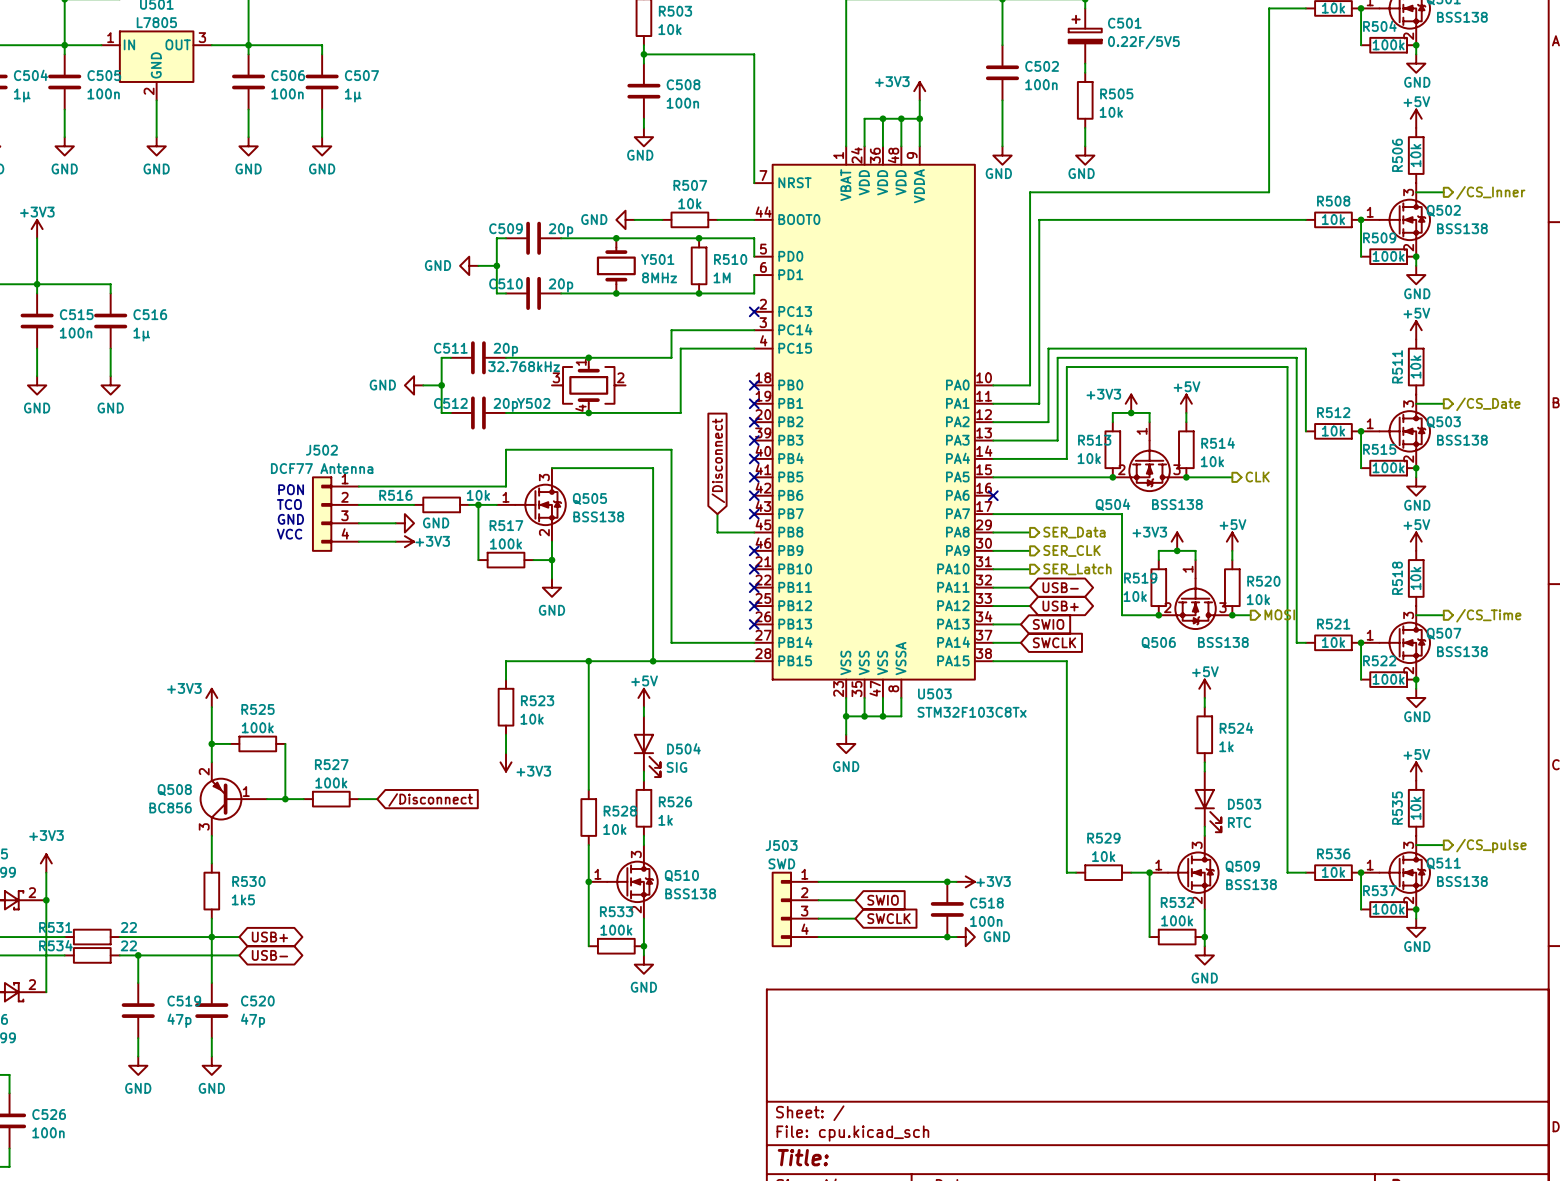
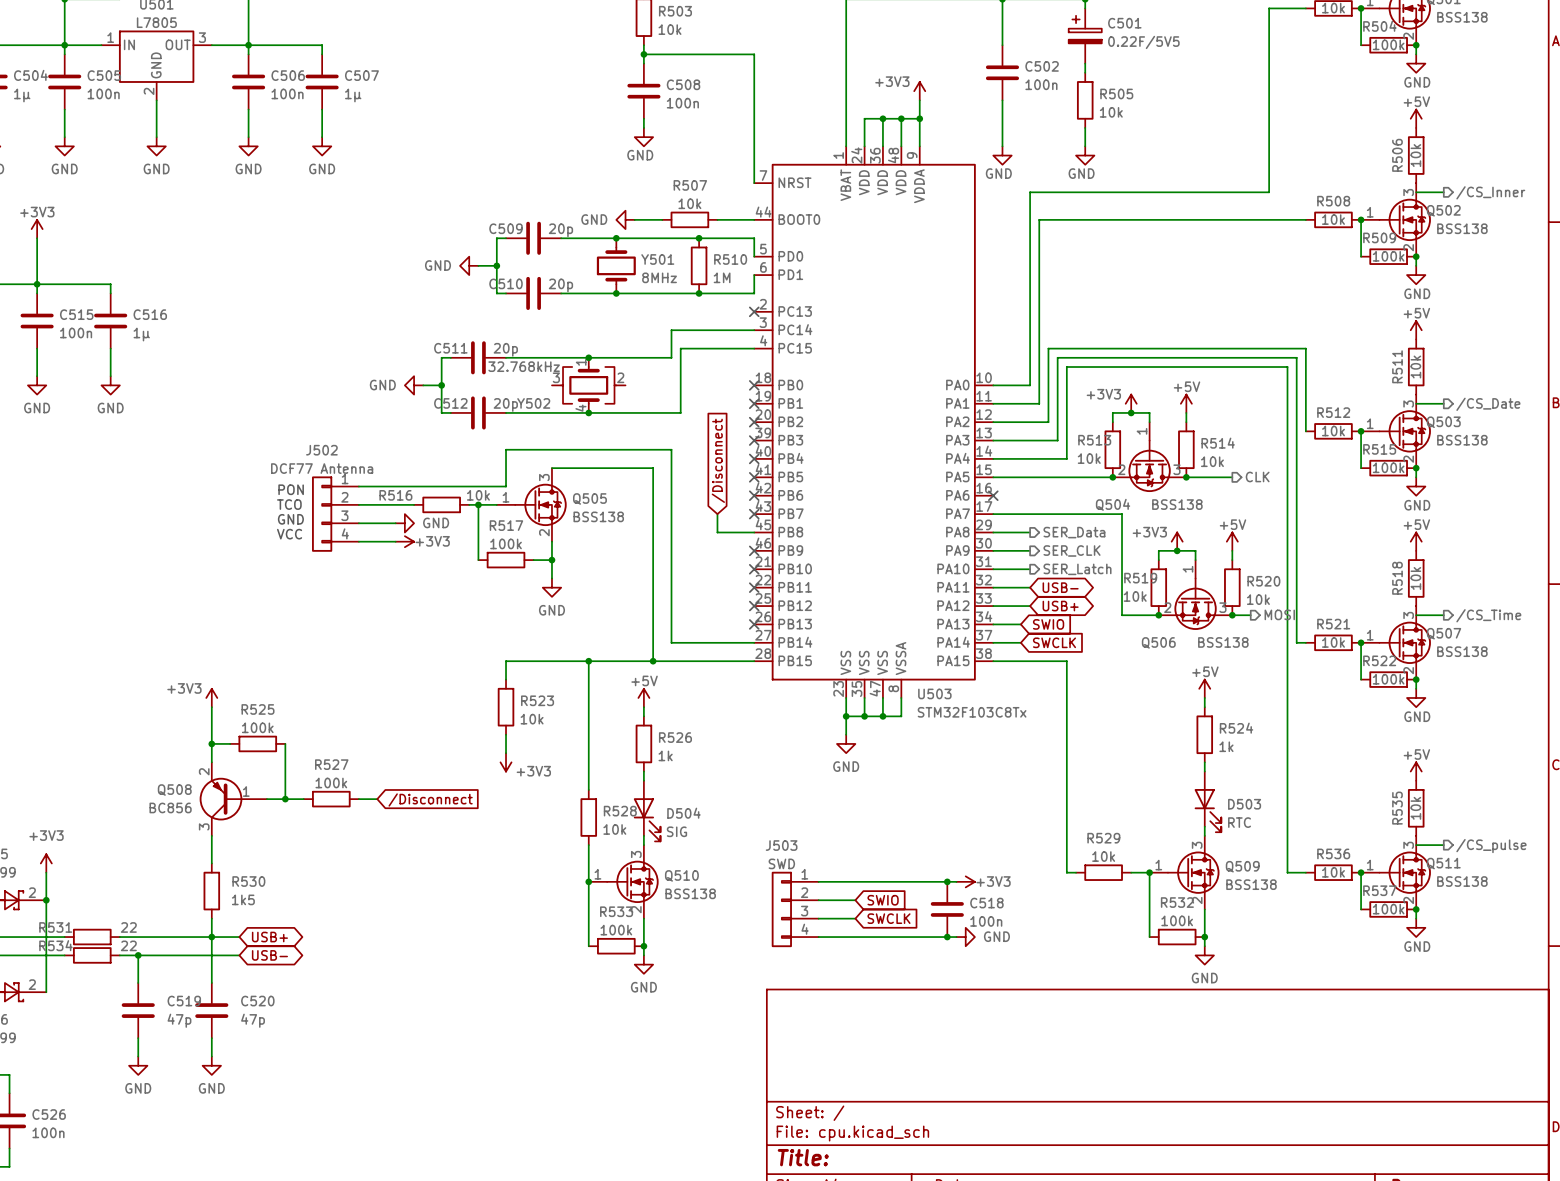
D504 position: (647, 746) -> (647, 811)
R526 position: (643, 808) -> (643, 743)

